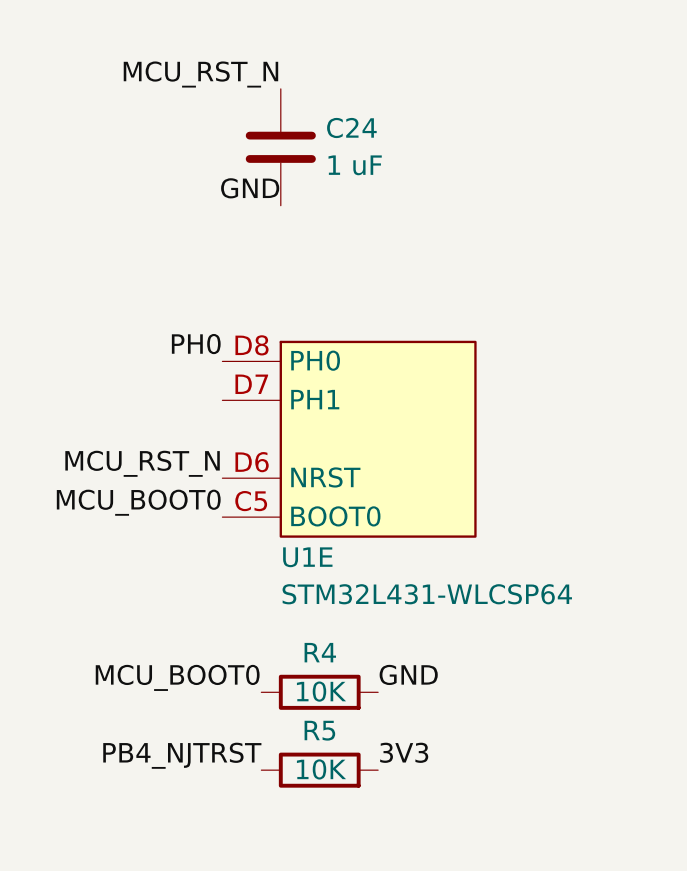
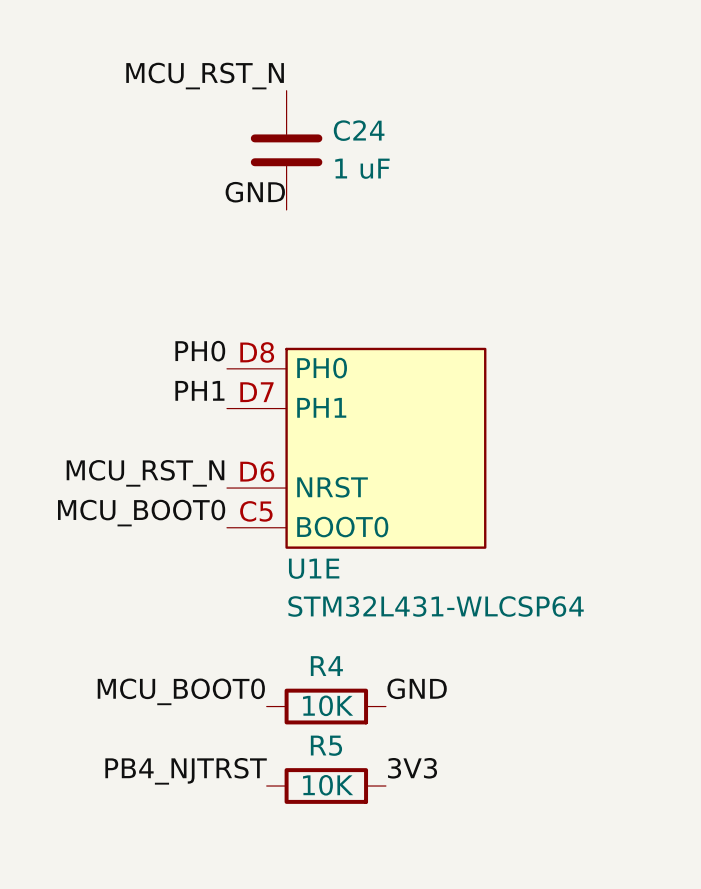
label: none -> PH1 (199, 390)

